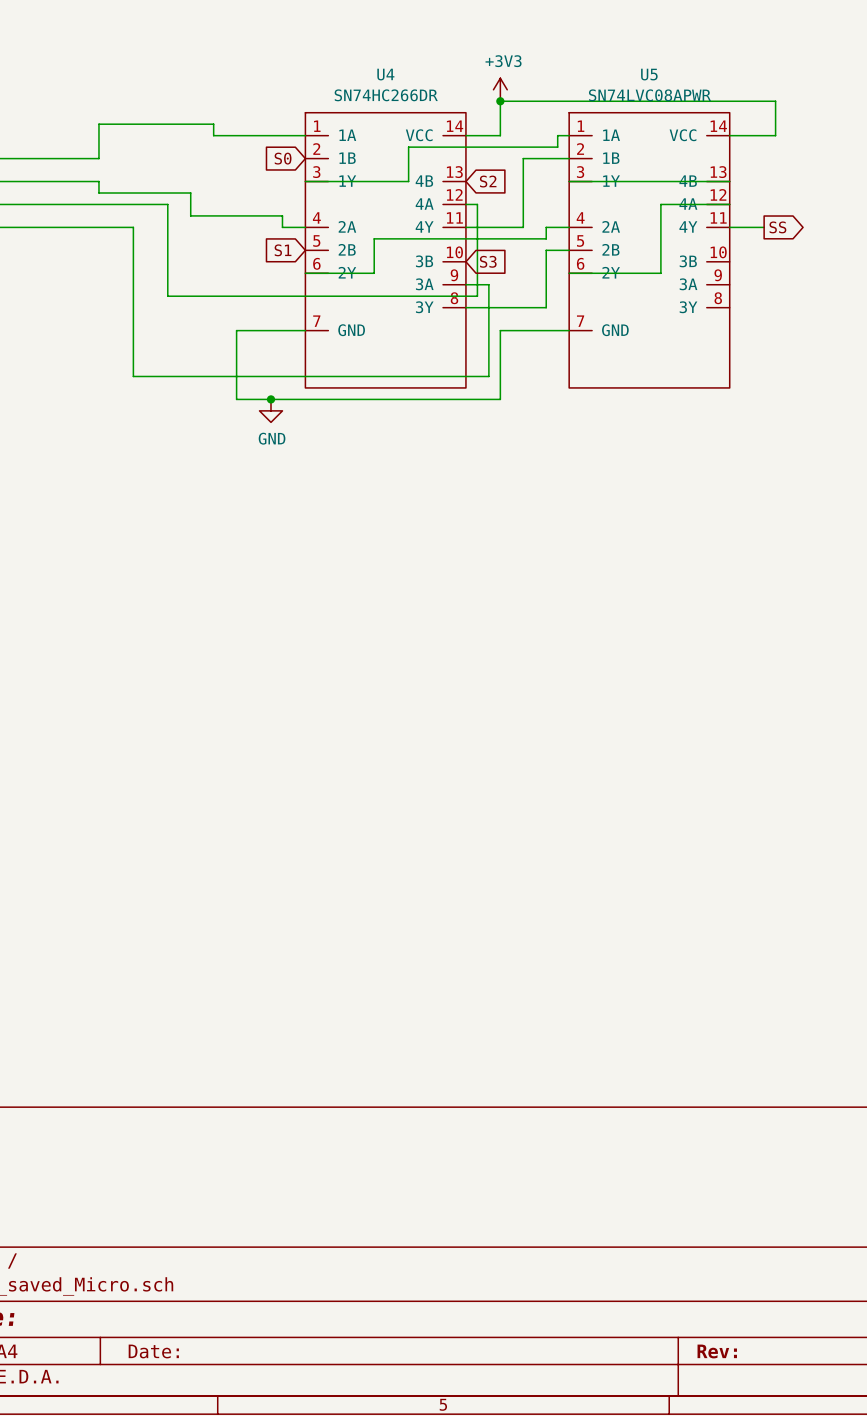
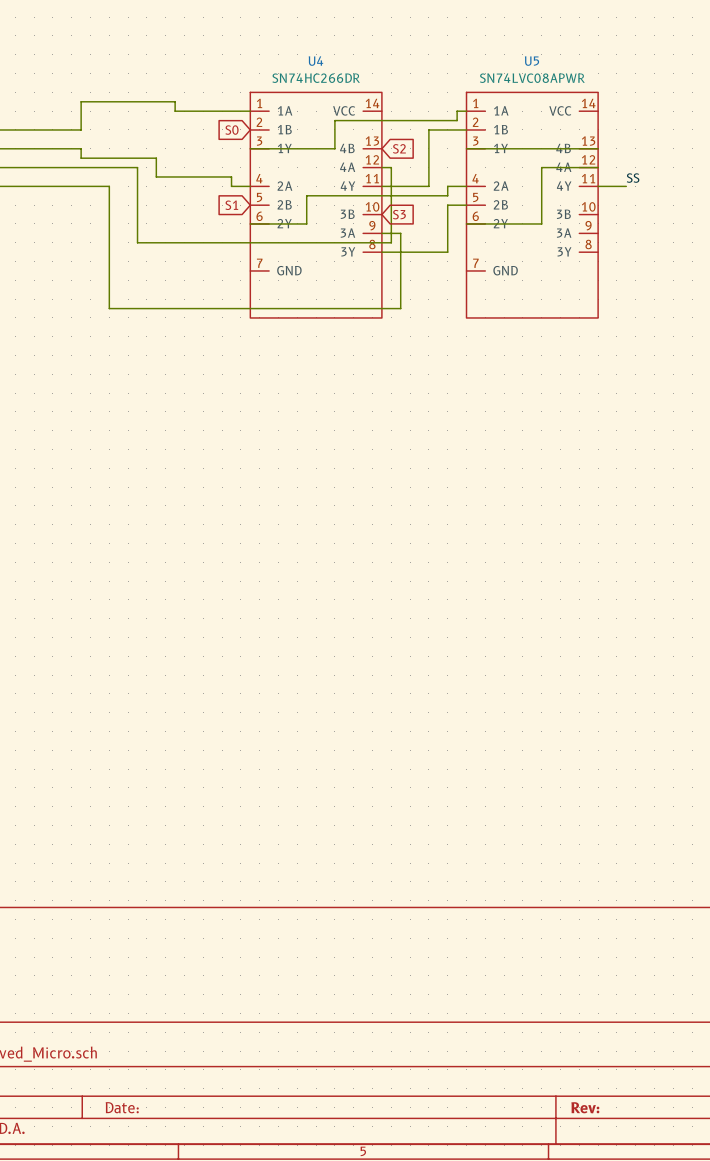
power symbol: +3V3 (500, 89) -> none
junction: (500, 101) -> none
wire: (465, 135) (500, 135) (500, 101) (775, 101) (775, 135) (729, 135) -> none
label: none -> SS (633, 178)
global label: SS (777, 227) -> none
wire: (305, 330) (236, 330) (236, 399) (500, 399) (500, 330) (569, 330) -> none
junction: (271, 399) -> none
power symbol: GND (271, 410) -> none

